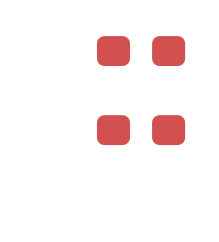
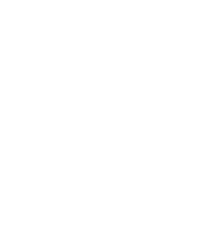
part: (141, 51) -> none
part: (141, 130) -> none

